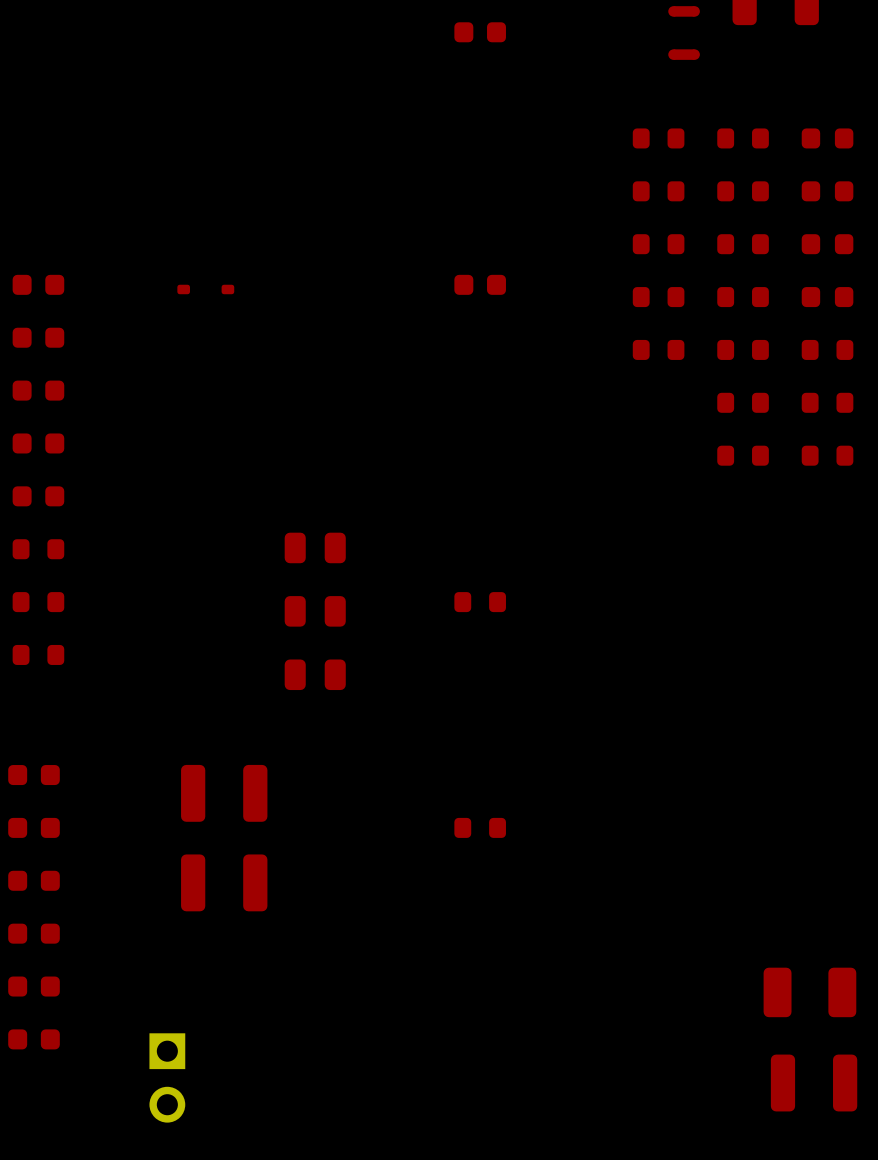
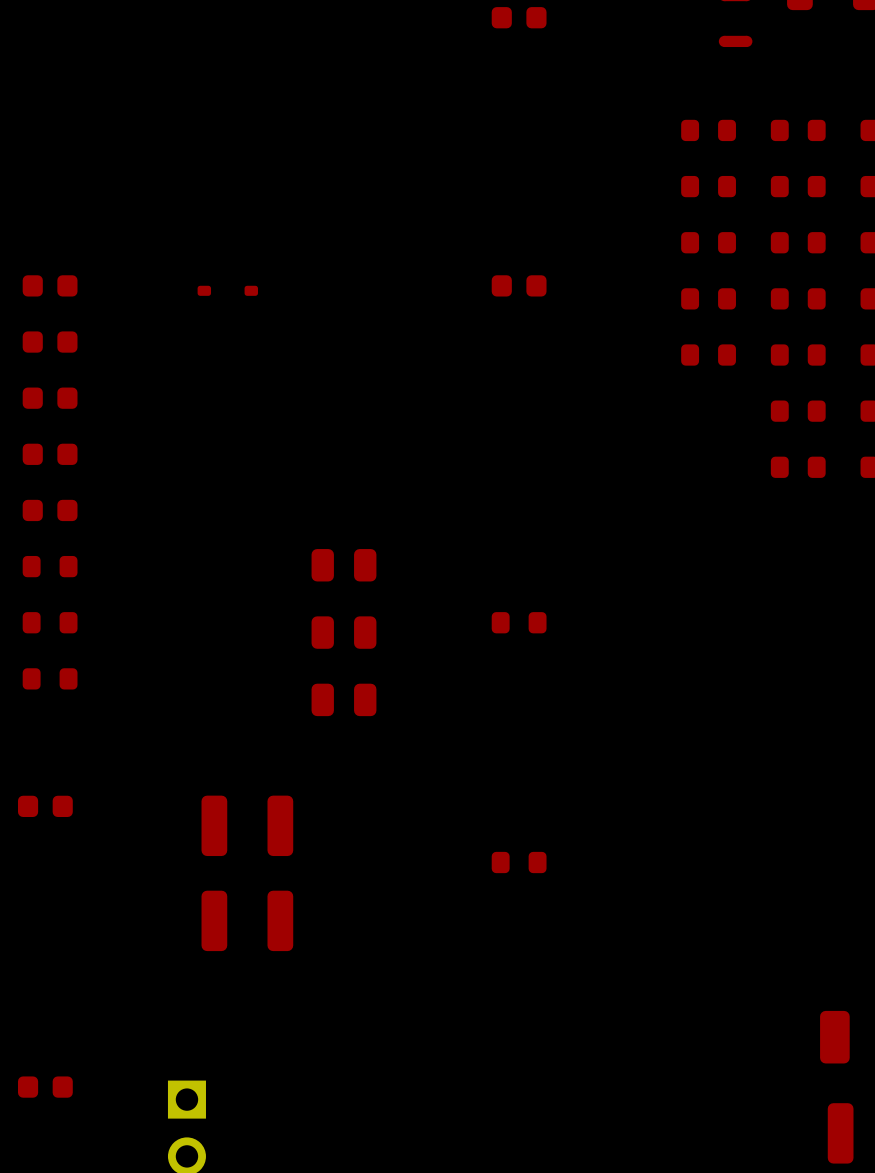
part: (34, 827) -> none
part: (34, 880) -> none
part: (34, 933) -> none
part: (34, 986) -> none

